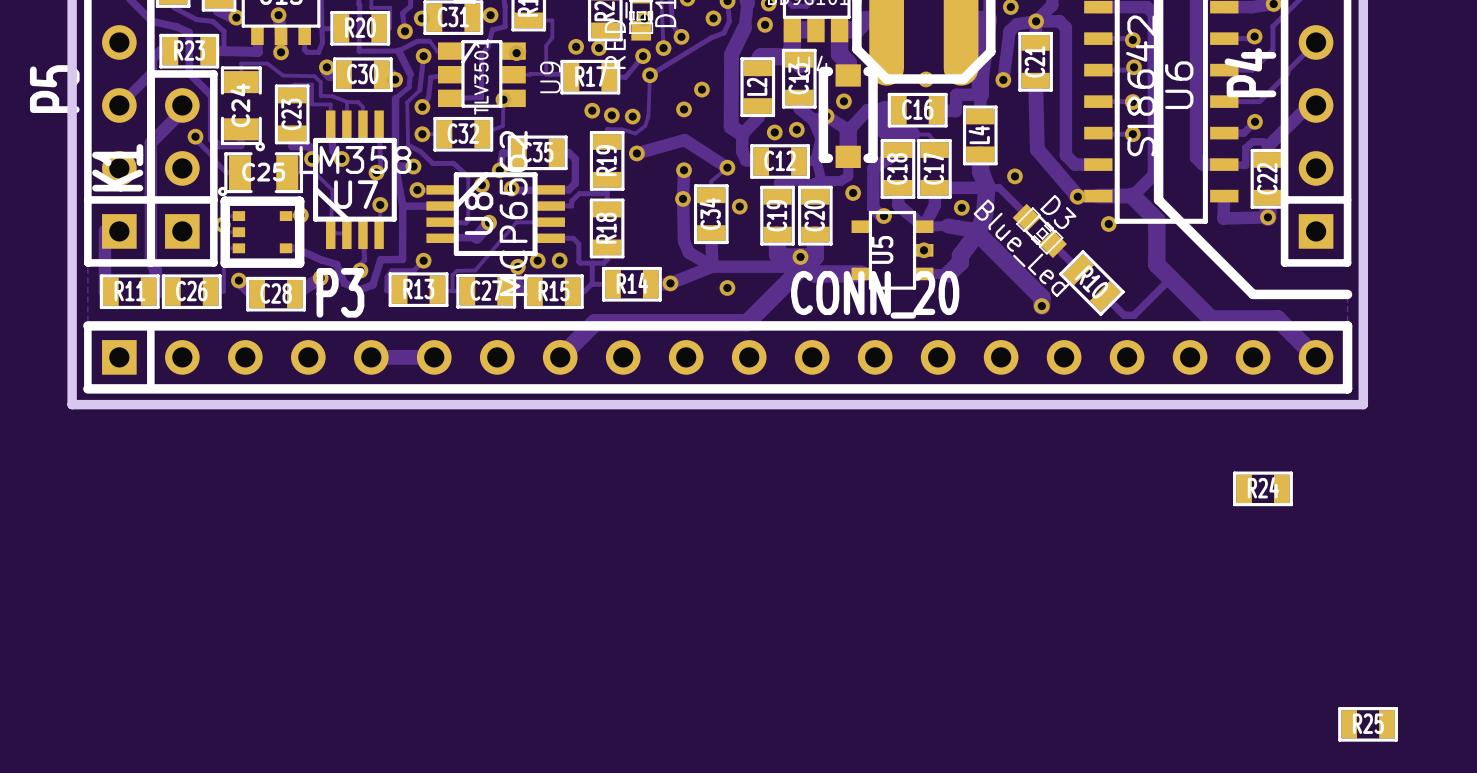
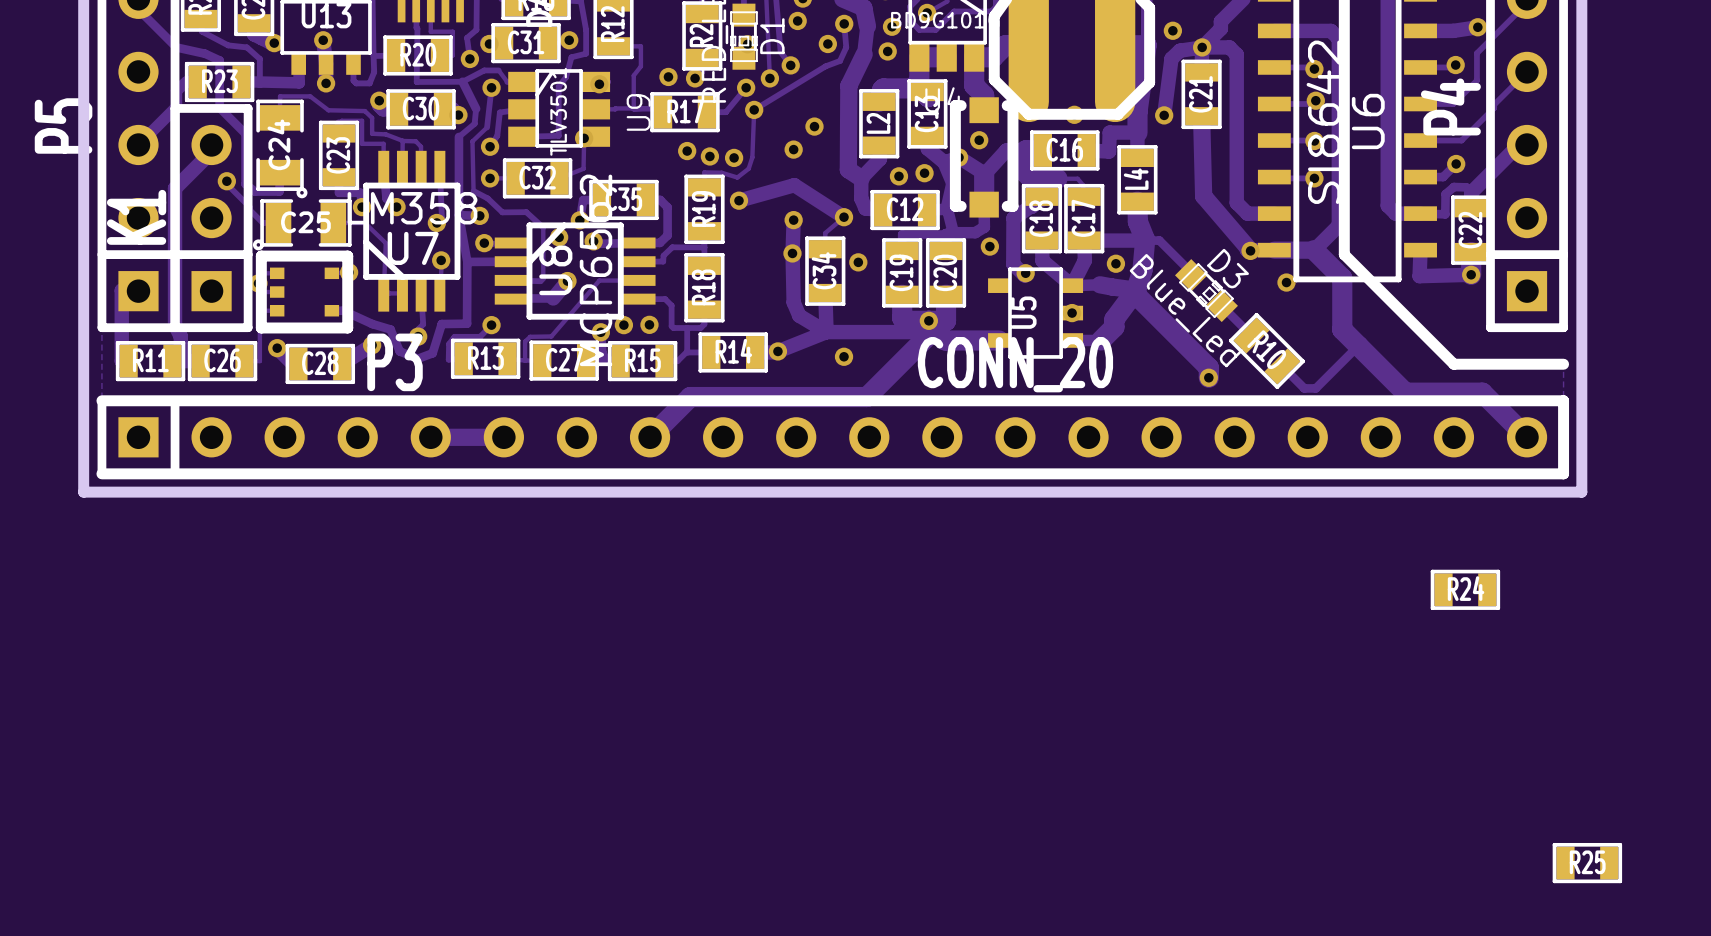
via: (1015, 176) -> none

